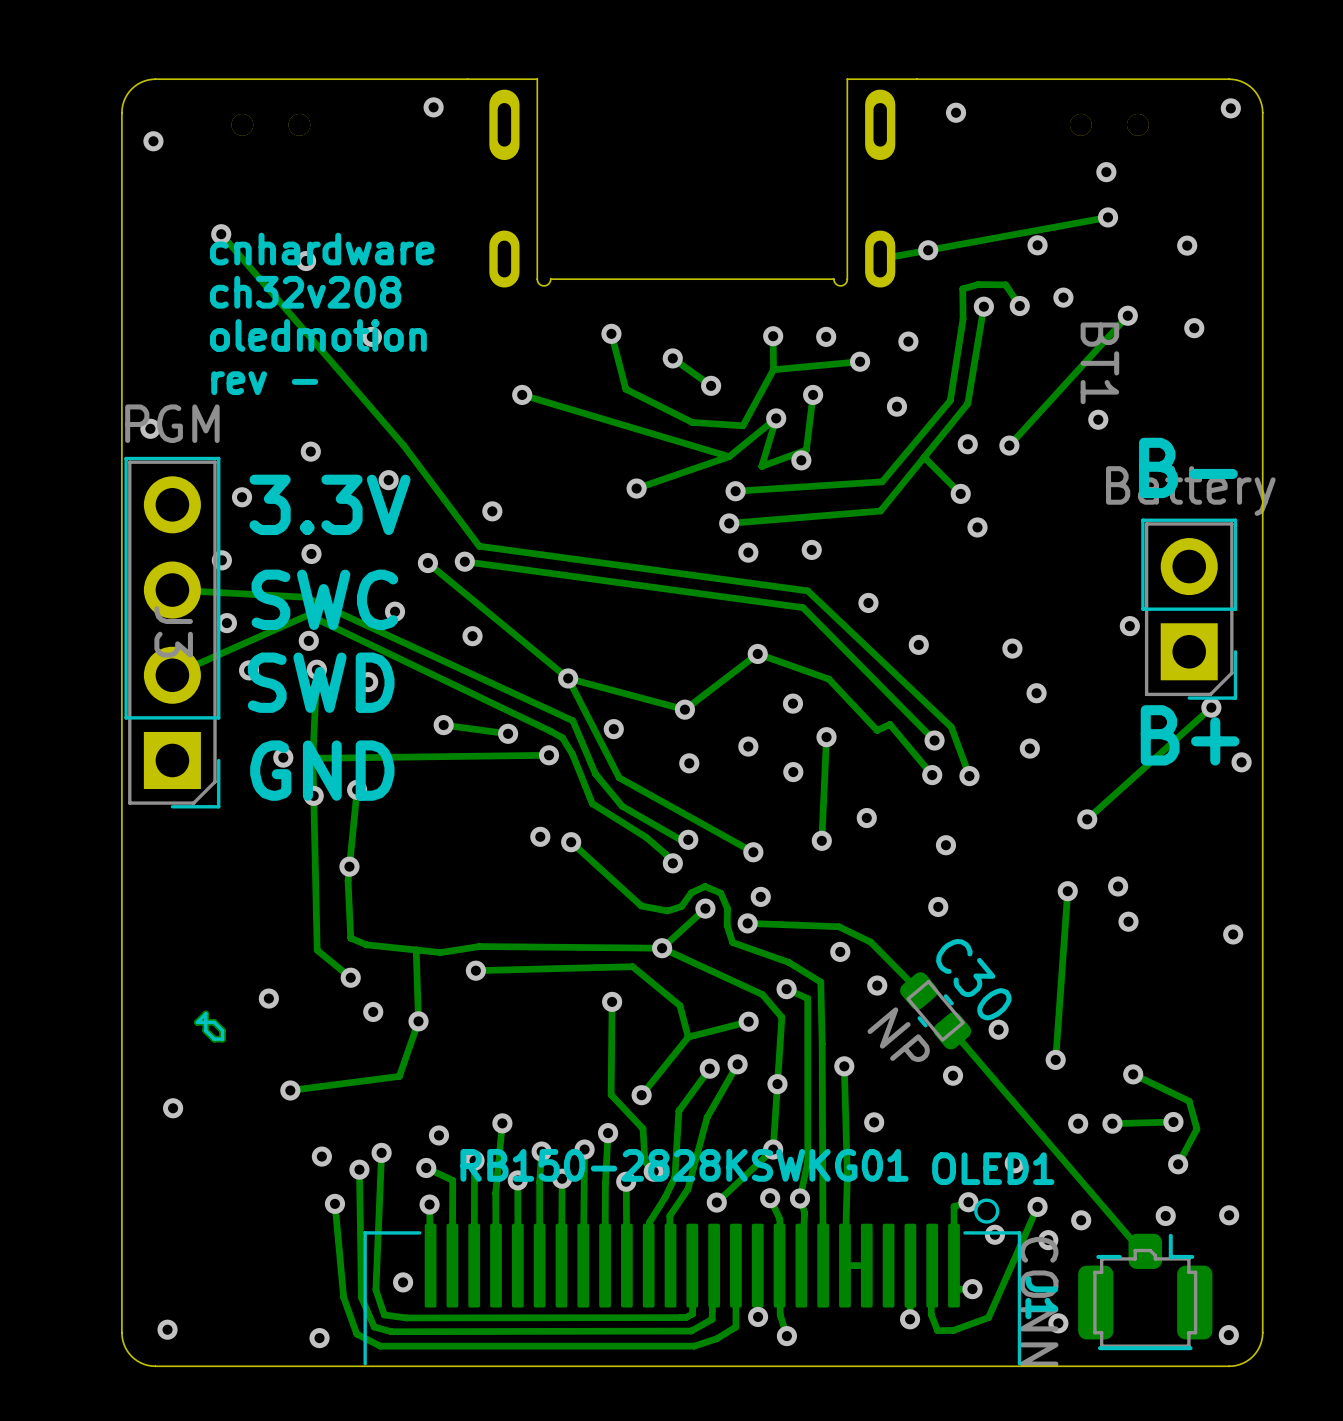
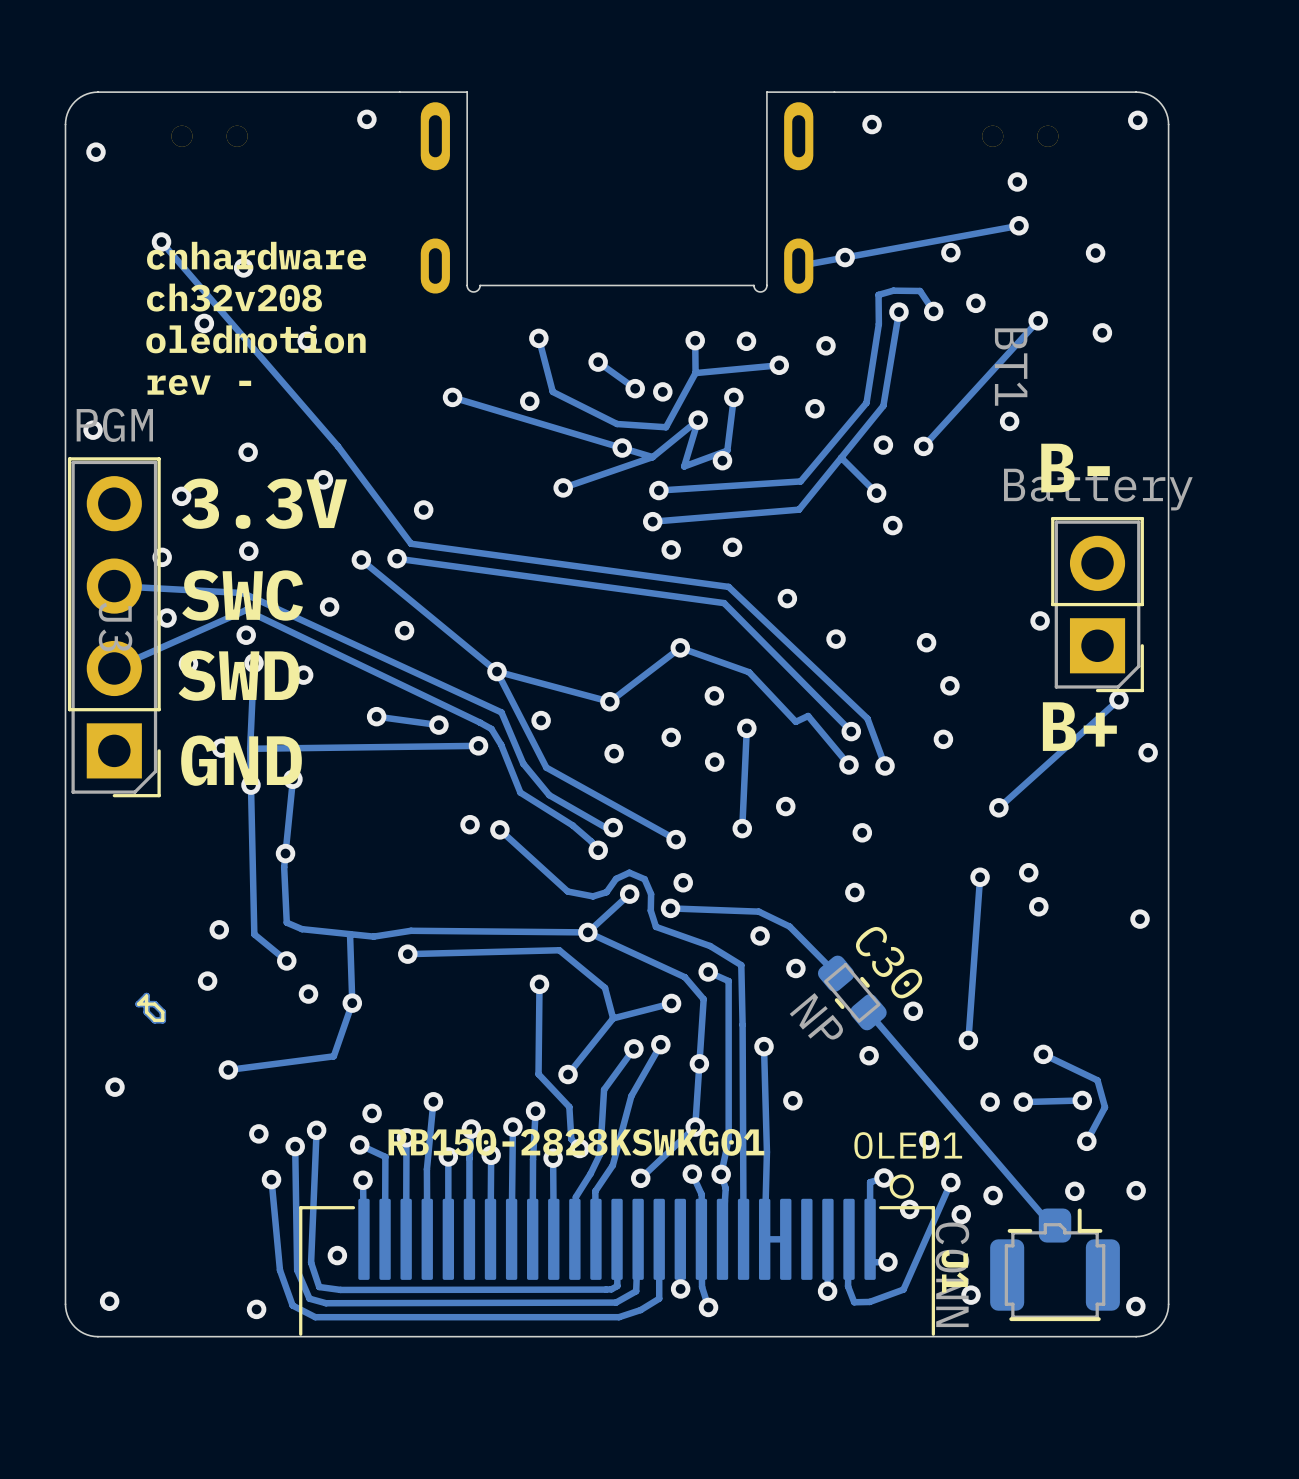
via: none -> (204, 323)
via: none -> (662, 391)
via: none -> (529, 401)
via: none -> (622, 448)
via: none -> (219, 929)

